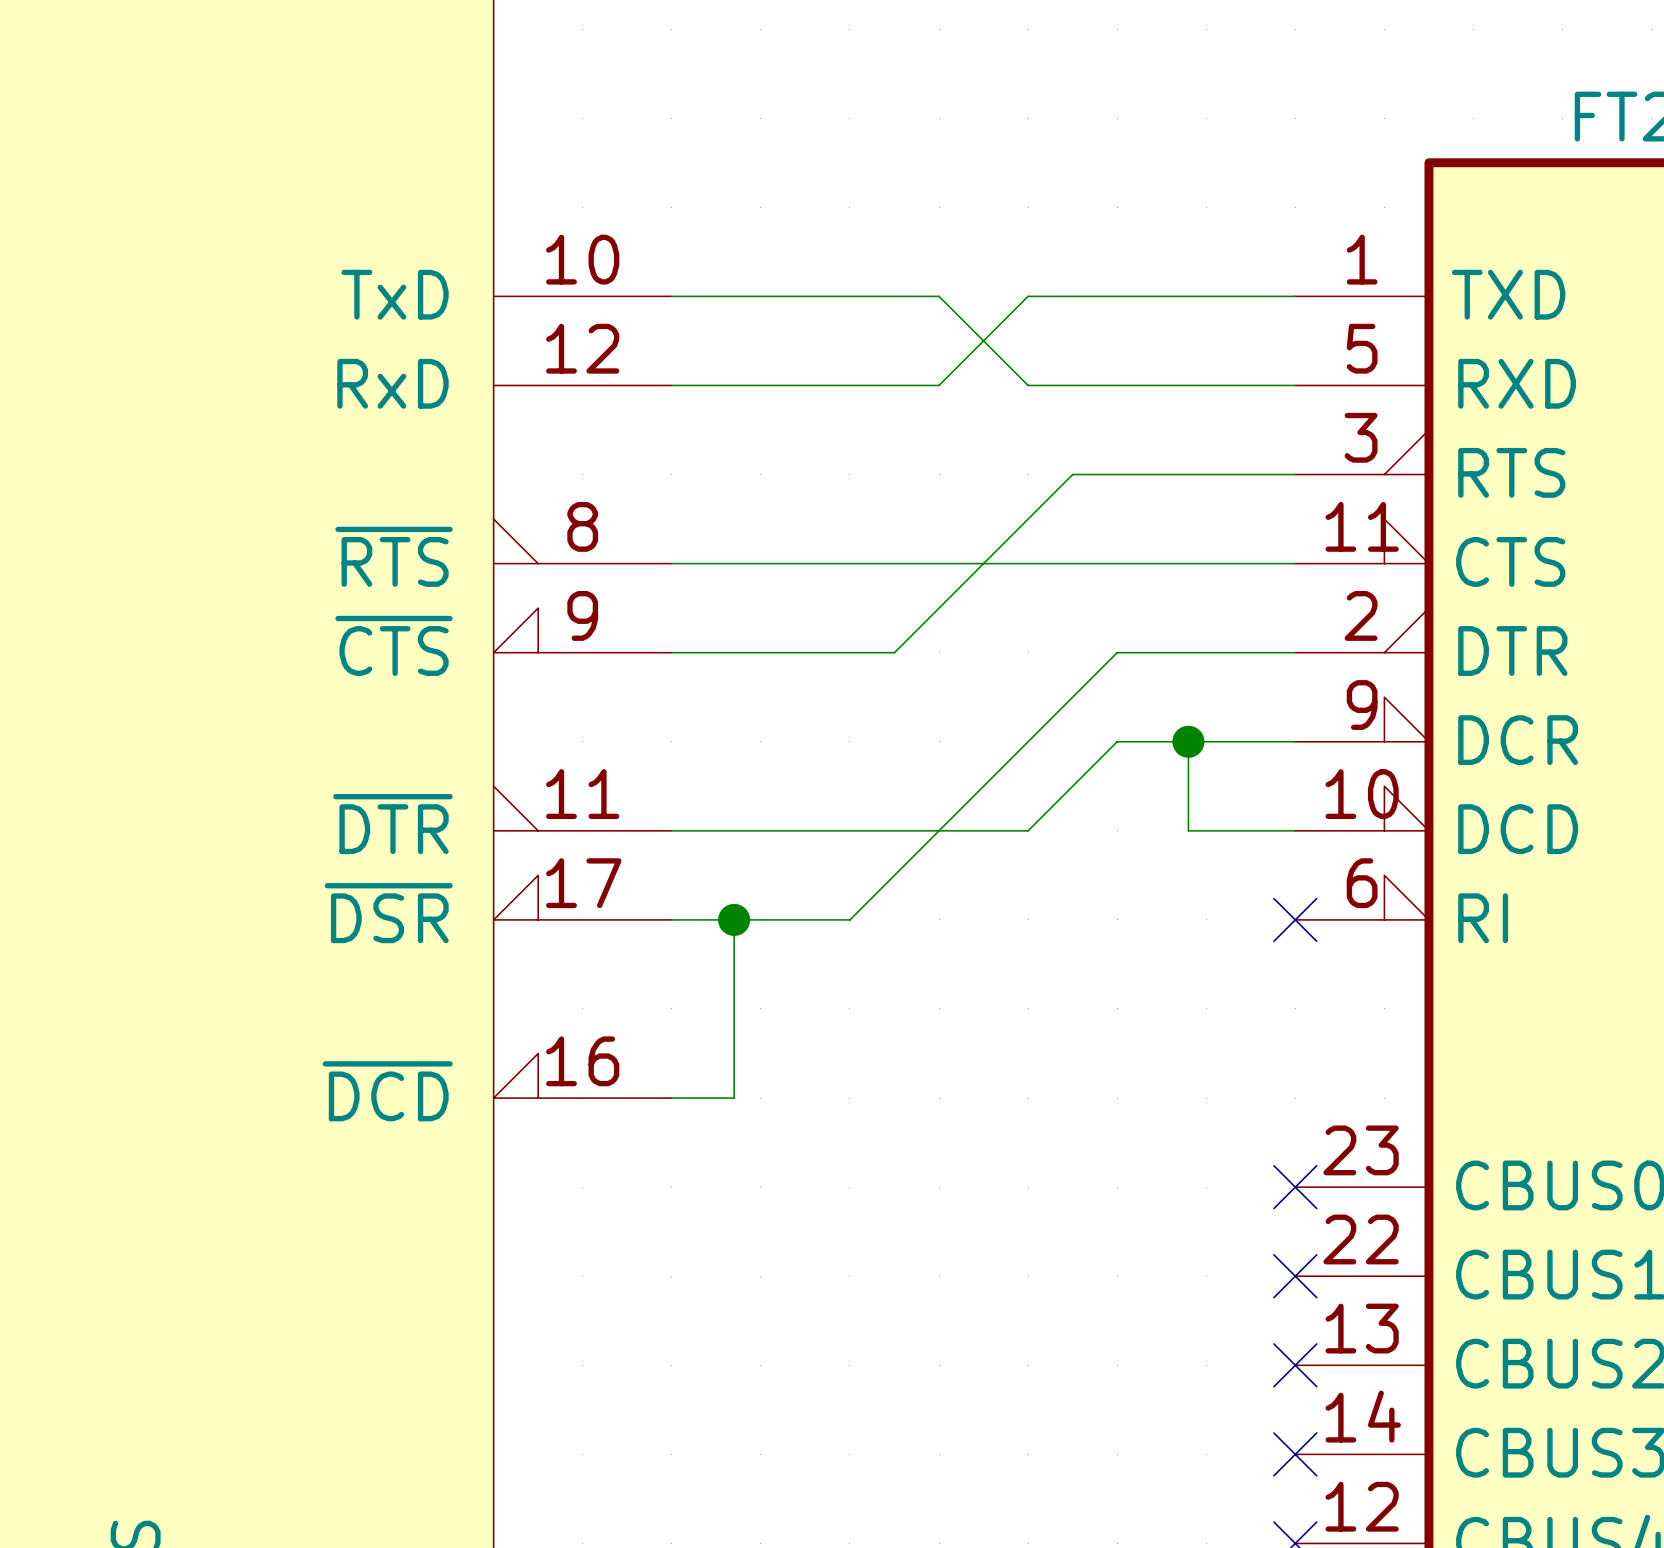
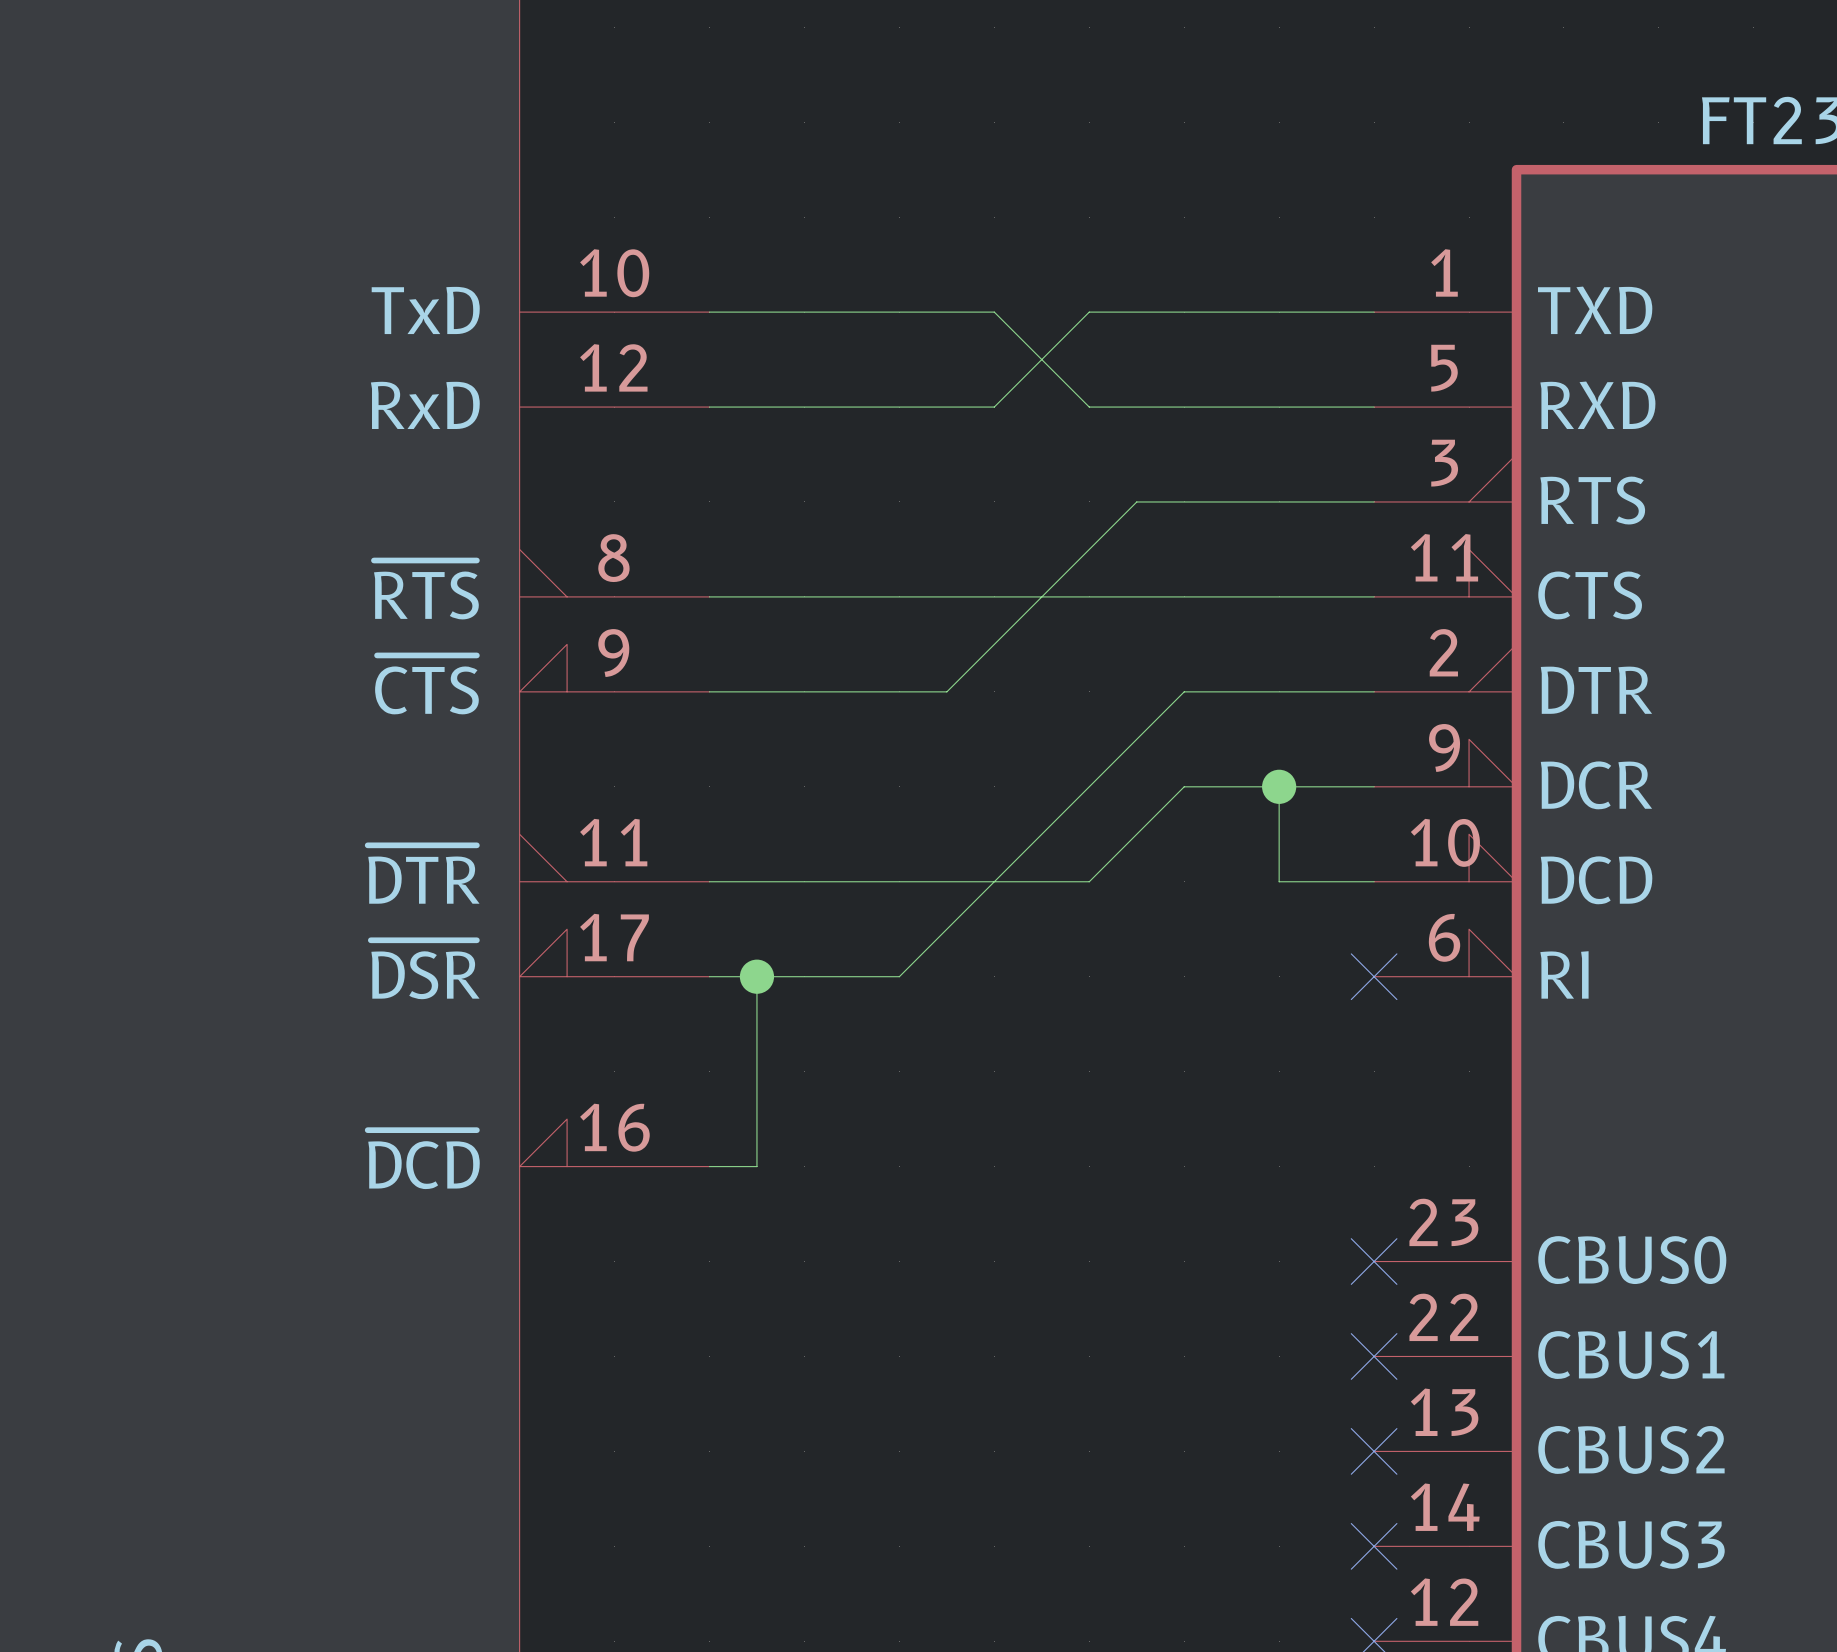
wire: (1188, 741) (1188, 830) (1206, 830) -> (1279, 786) (1279, 881)
junction position: (1188, 741) -> (1279, 786)
wire: (734, 919) (734, 1098) (716, 1098) -> (756, 976) (756, 1166)
junction position: (734, 919) -> (756, 976)

